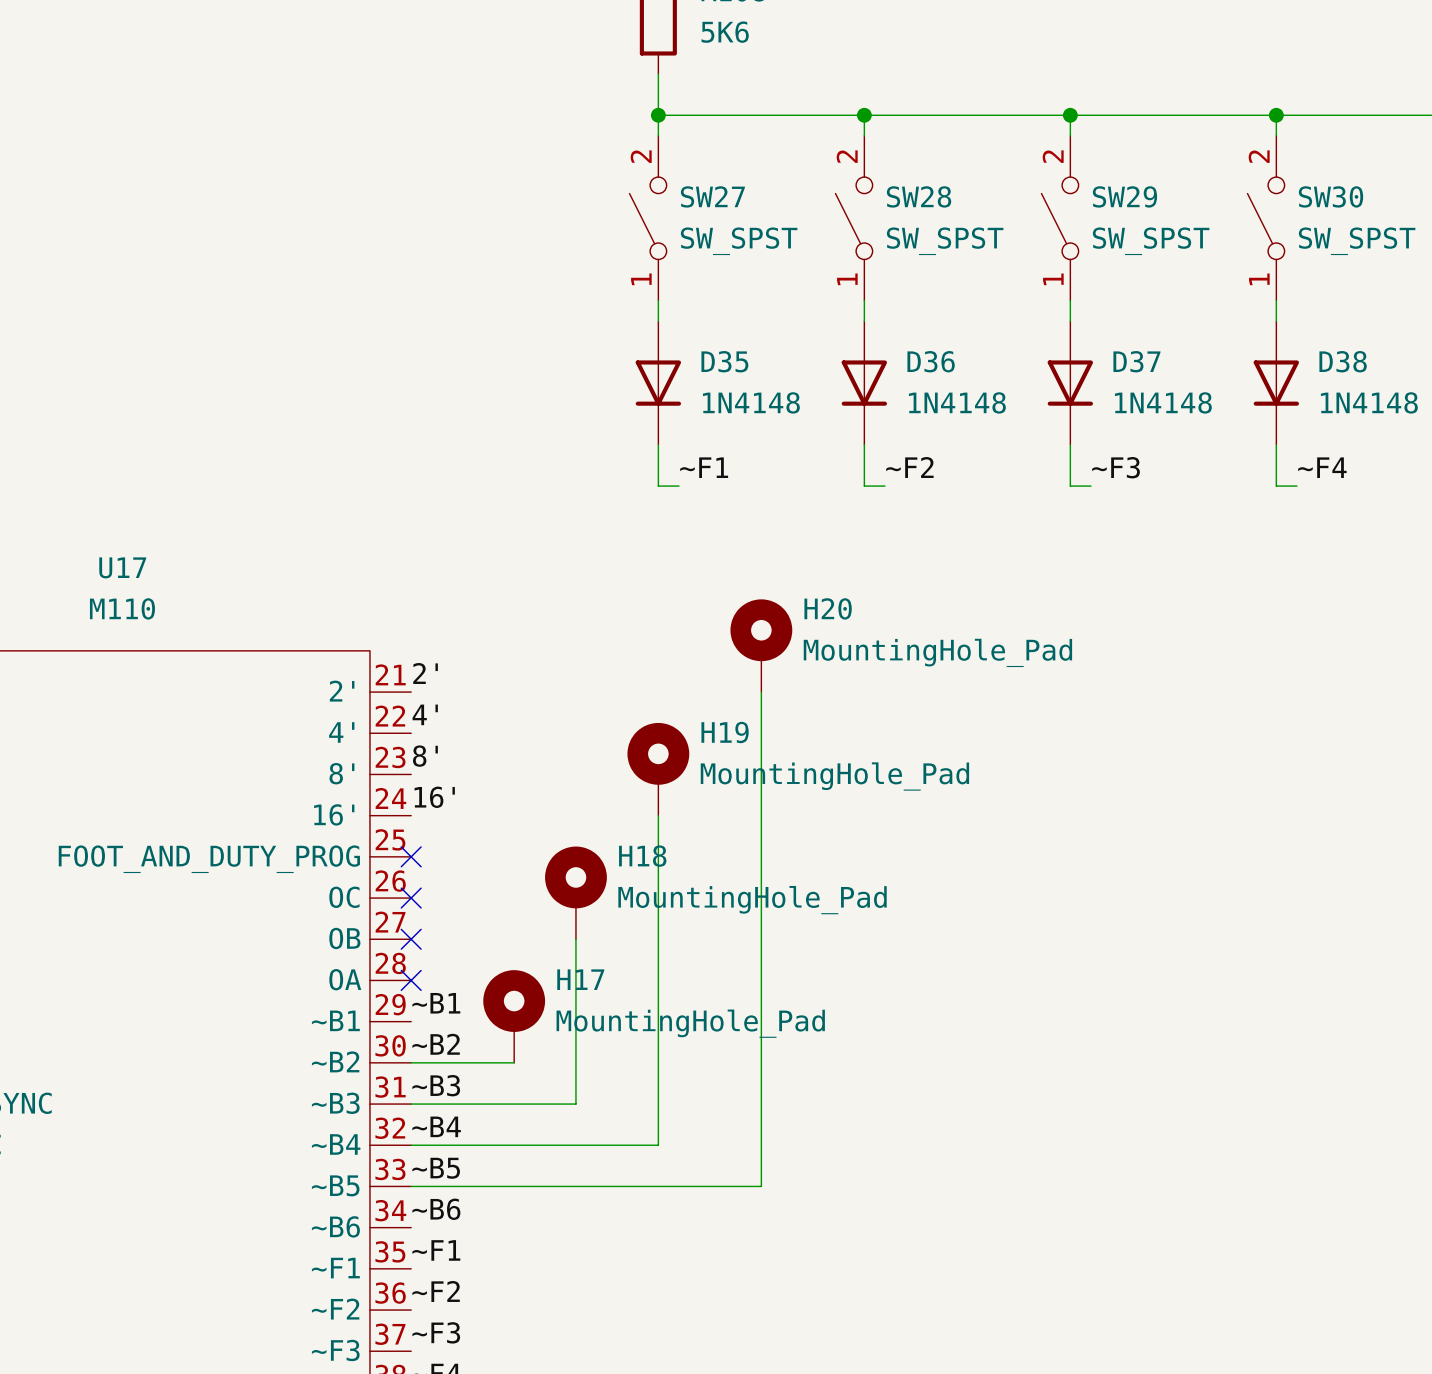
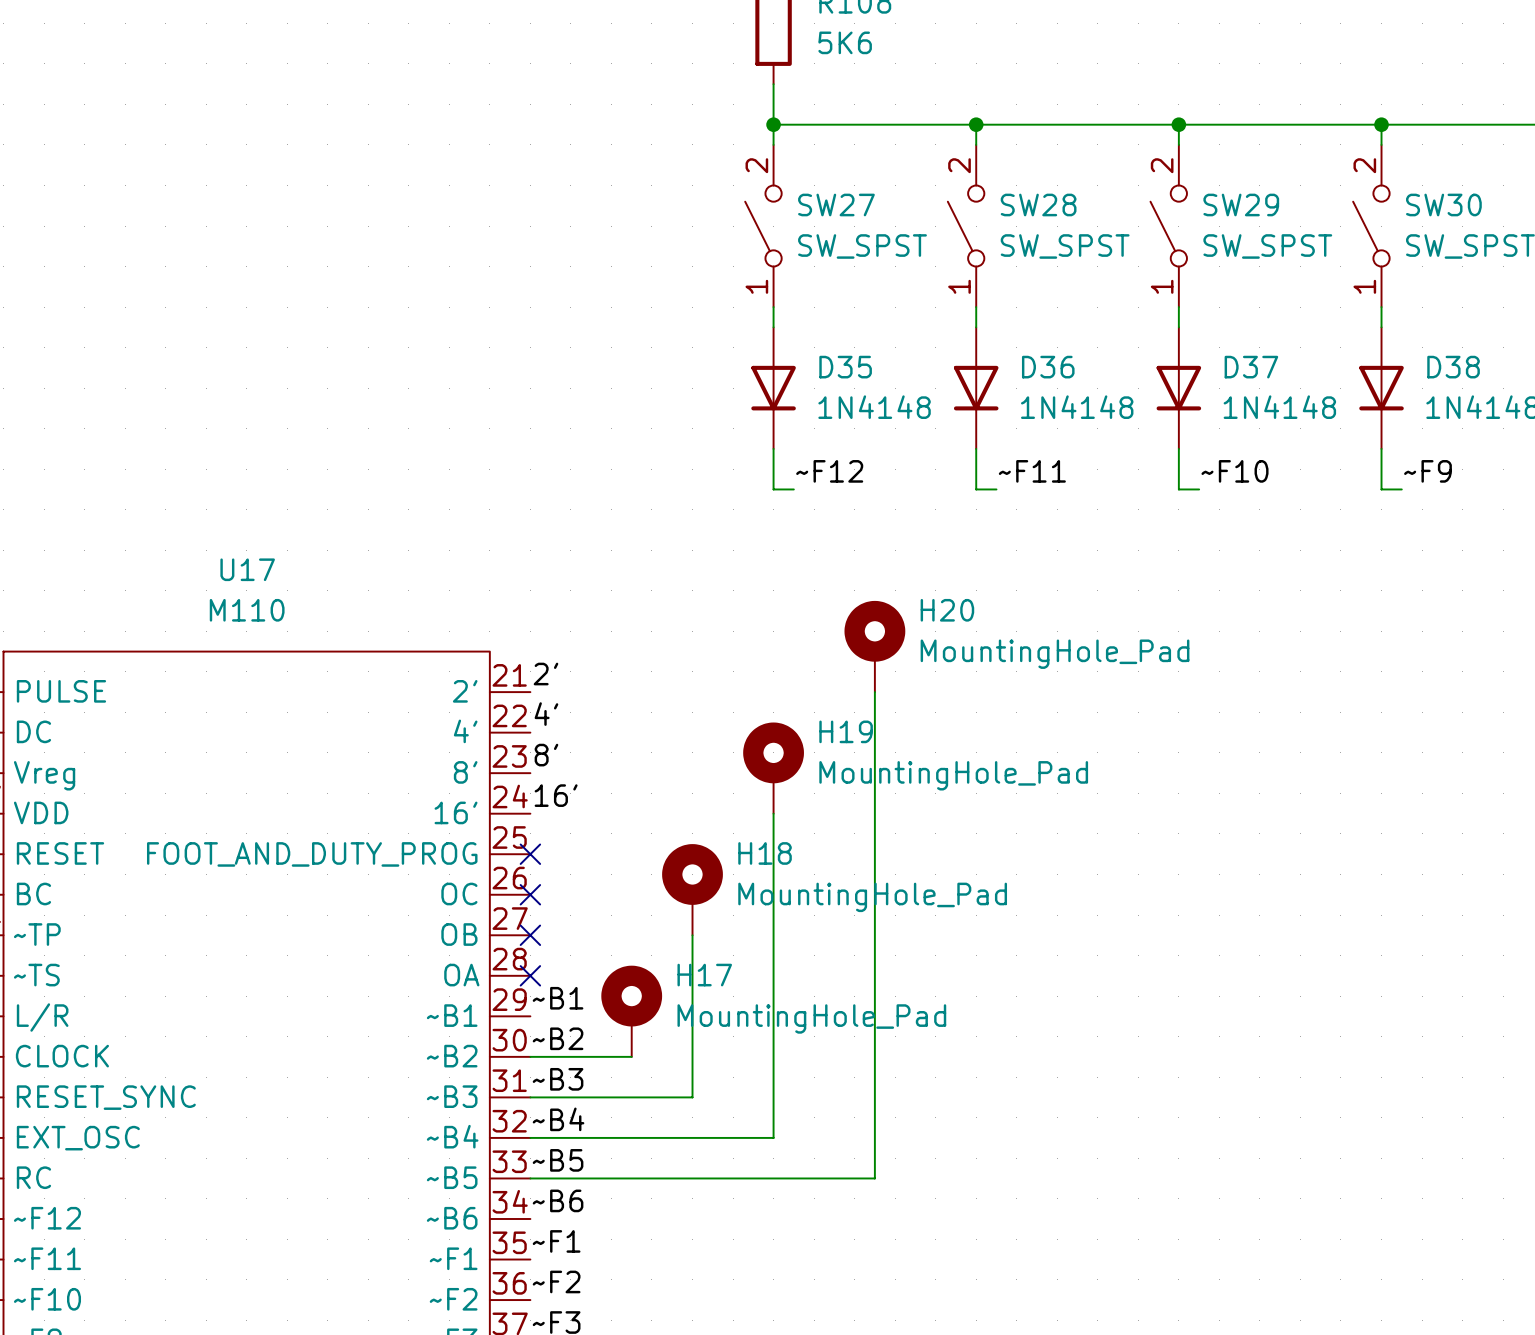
label: ~F1 (704, 467) -> ~F12 (829, 471)
label: ~F2 (909, 467) -> ~F11 (1032, 471)
label: ~F3 (1116, 467) -> ~F10 (1234, 471)
label: ~F4 (1322, 467) -> ~F9 (1427, 471)

